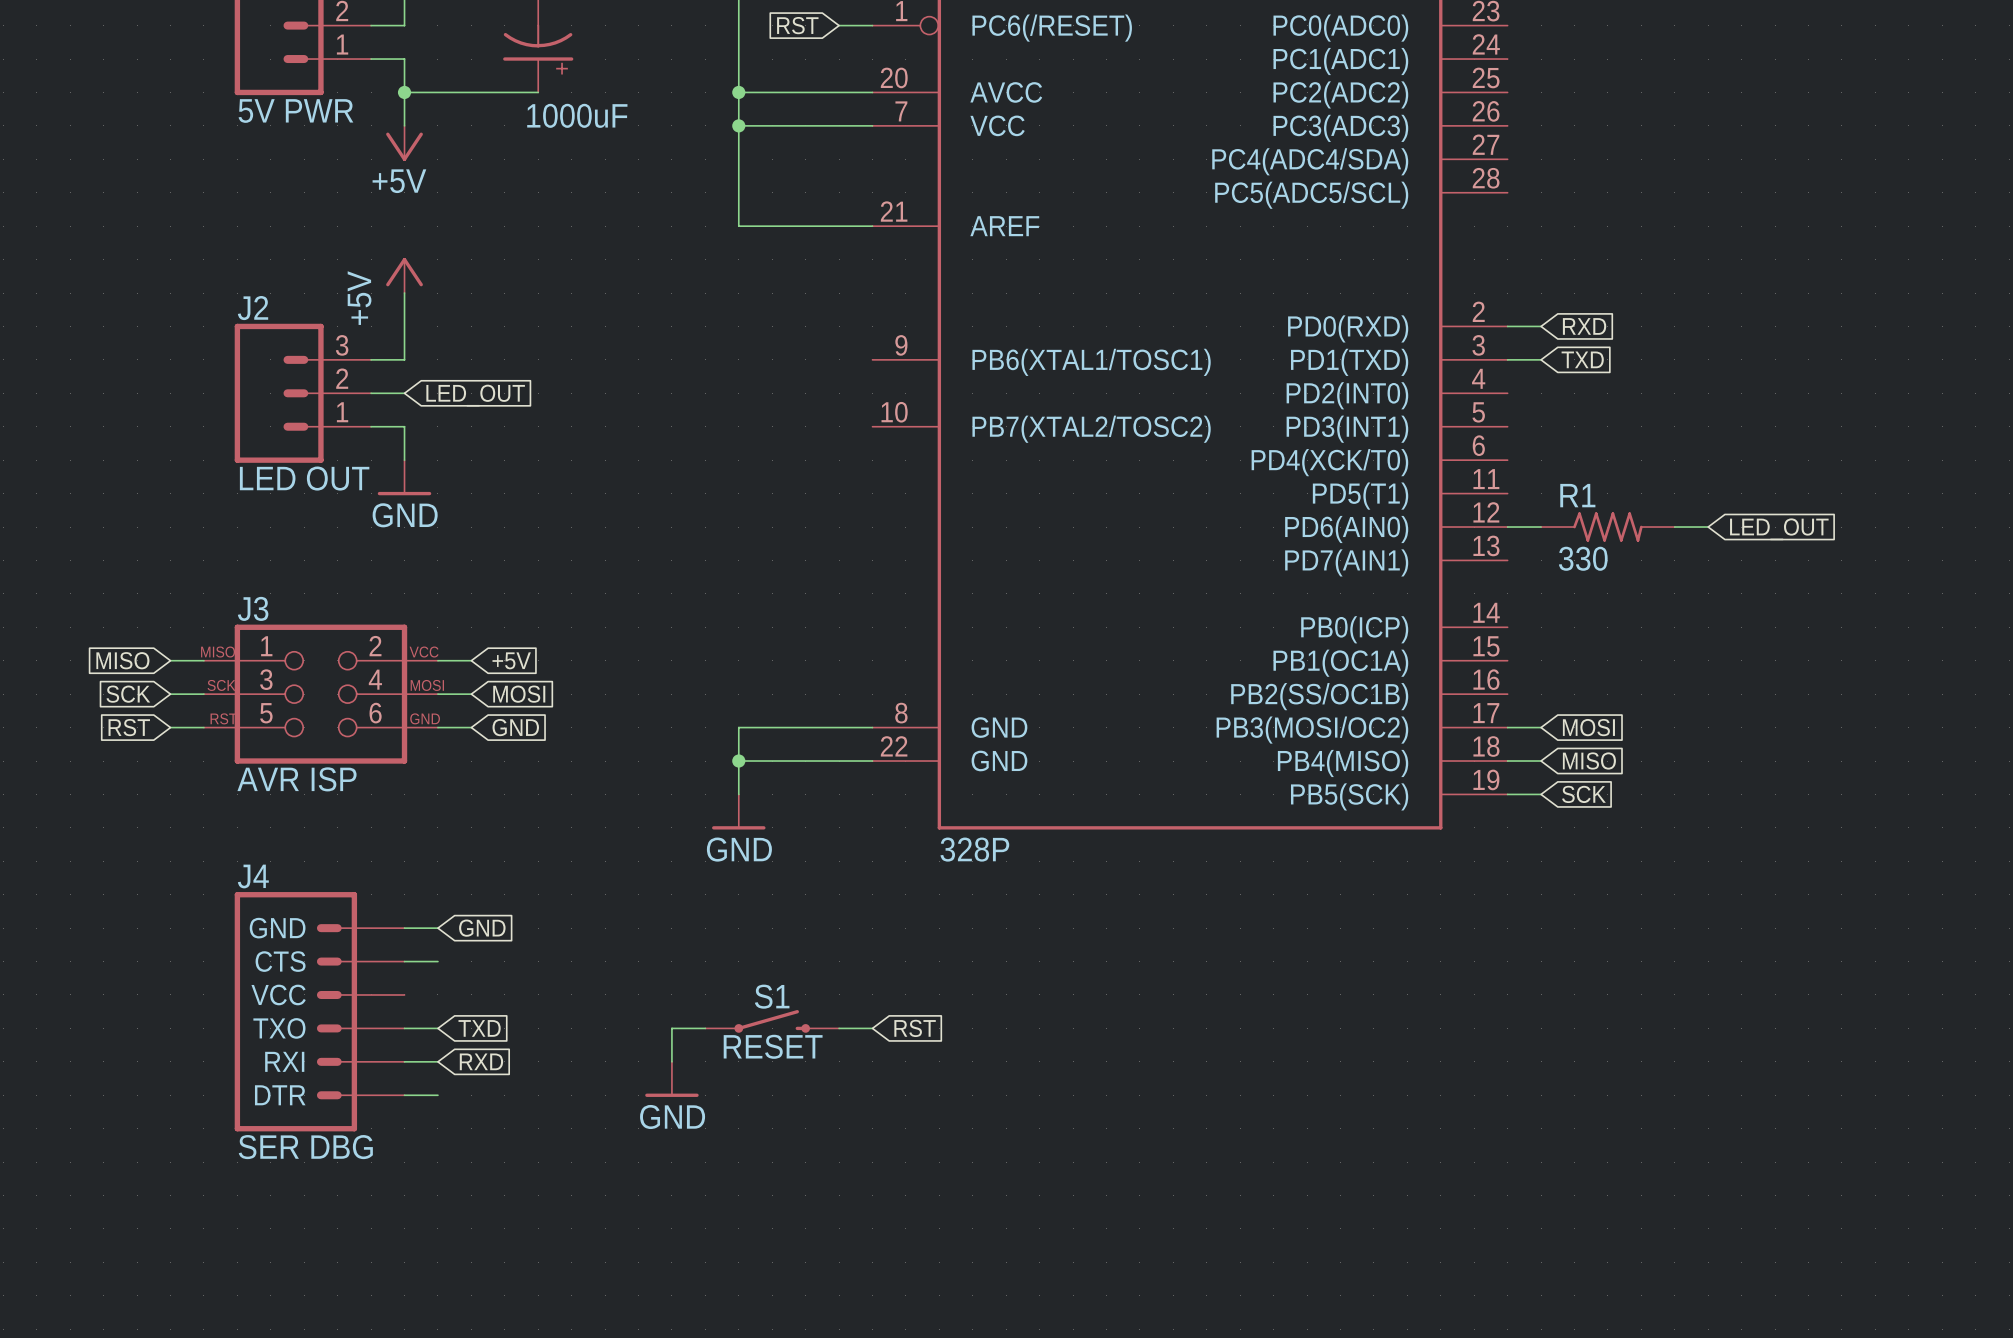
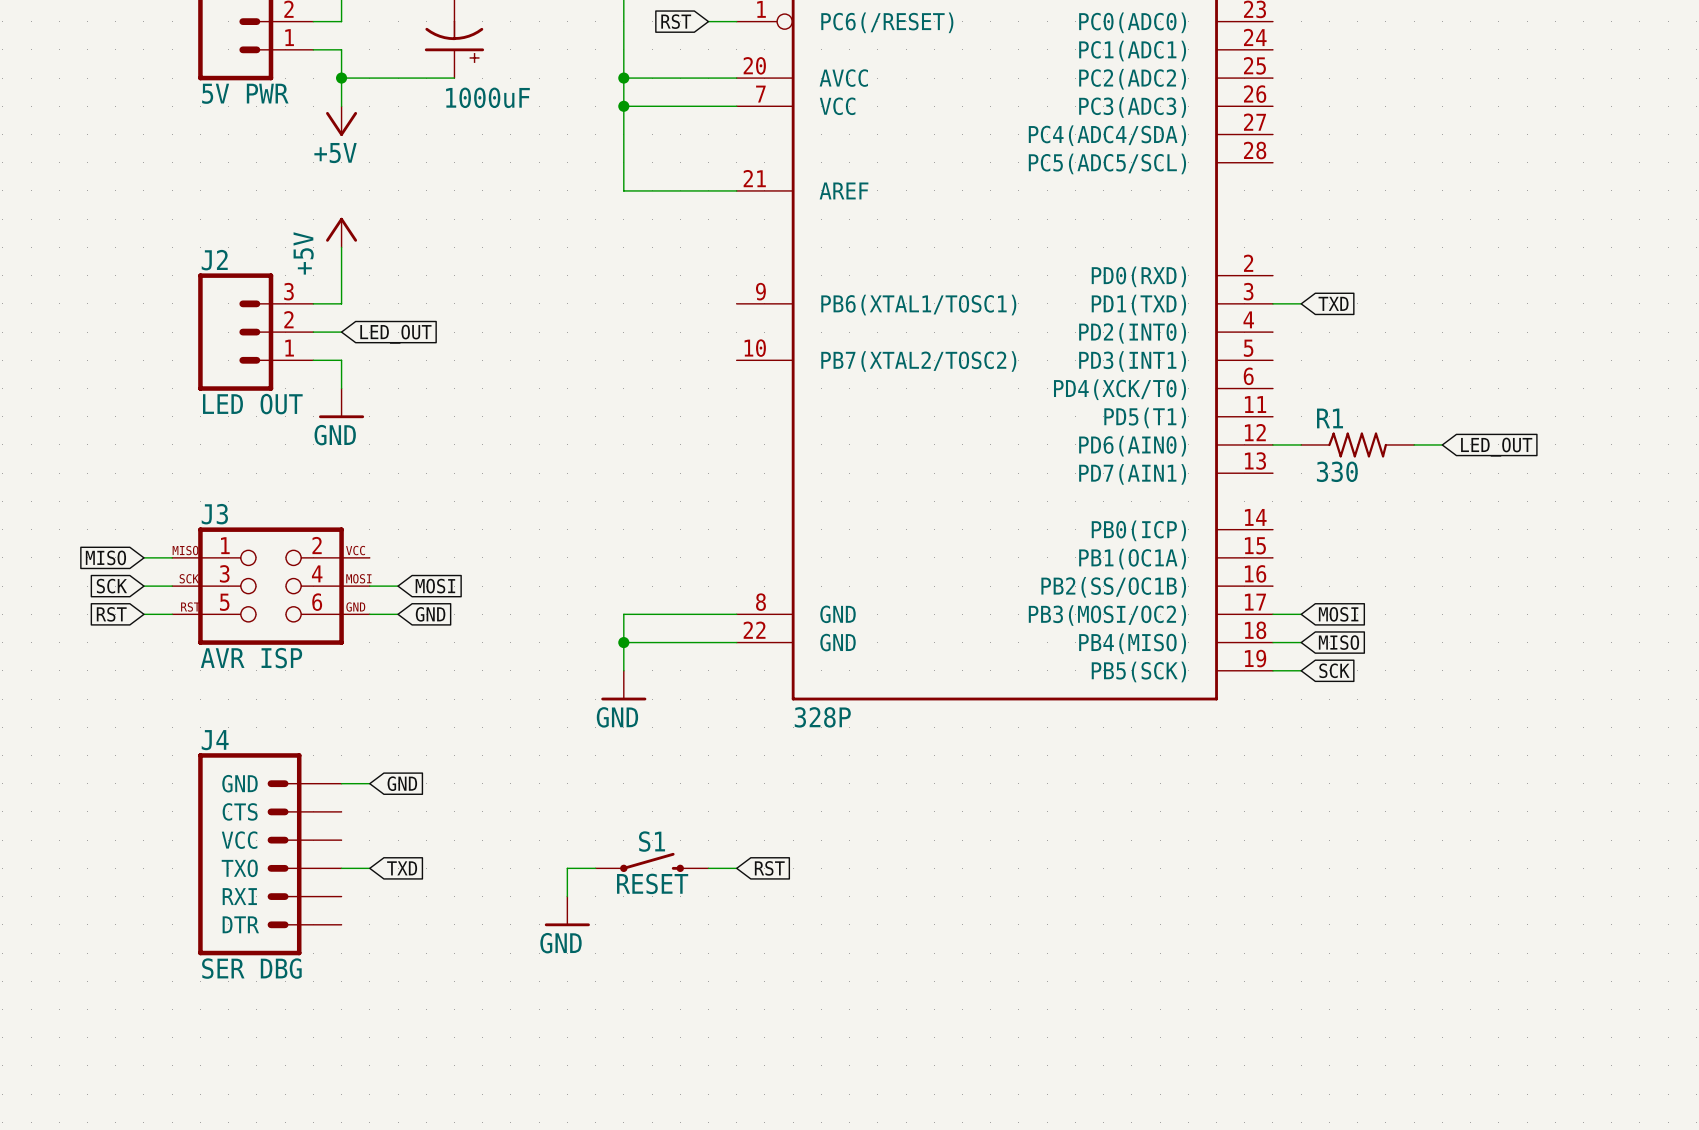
wire: (1507, 326) (1541, 326) -> none
global label: RXD (1584, 326) -> none
wire: (437, 660) (471, 660) -> none
global label: +5V (511, 660) -> none
wire: (404, 961) (437, 961) -> none
wire: (404, 1061) (437, 1061) -> none
global label: RXD (481, 1061) -> none
wire: (404, 1095) (437, 1095) -> none

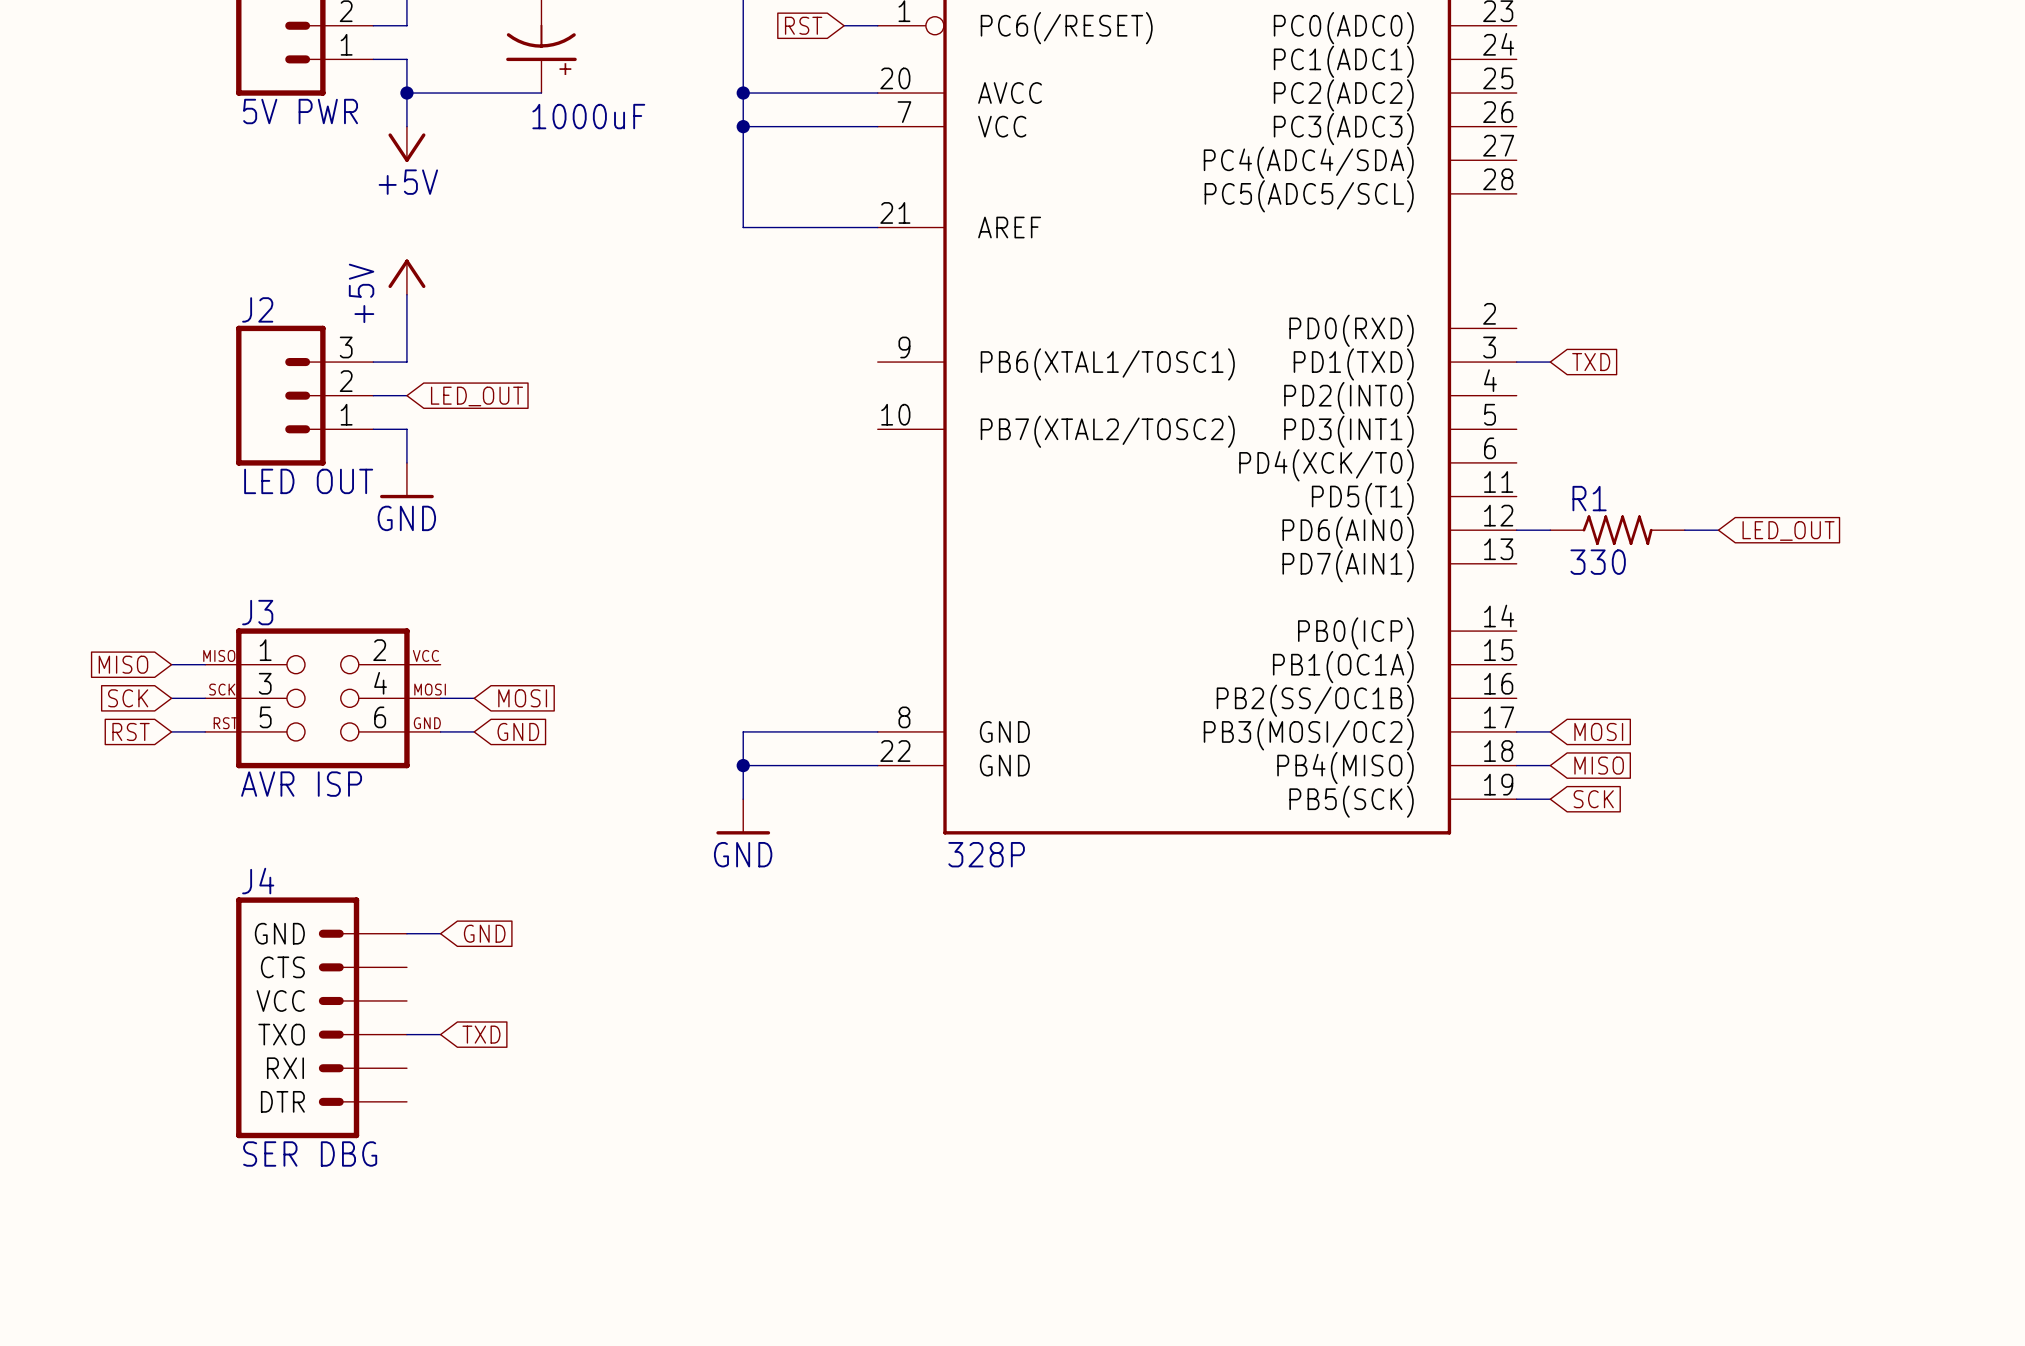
S1: RESET (652, 862) -> none
wire: (595, 868) (567, 868) (567, 896) -> none
wire: (708, 868) (736, 868) -> none
global label: RST (769, 868) -> none
power symbol: GND (567, 911) -> none

